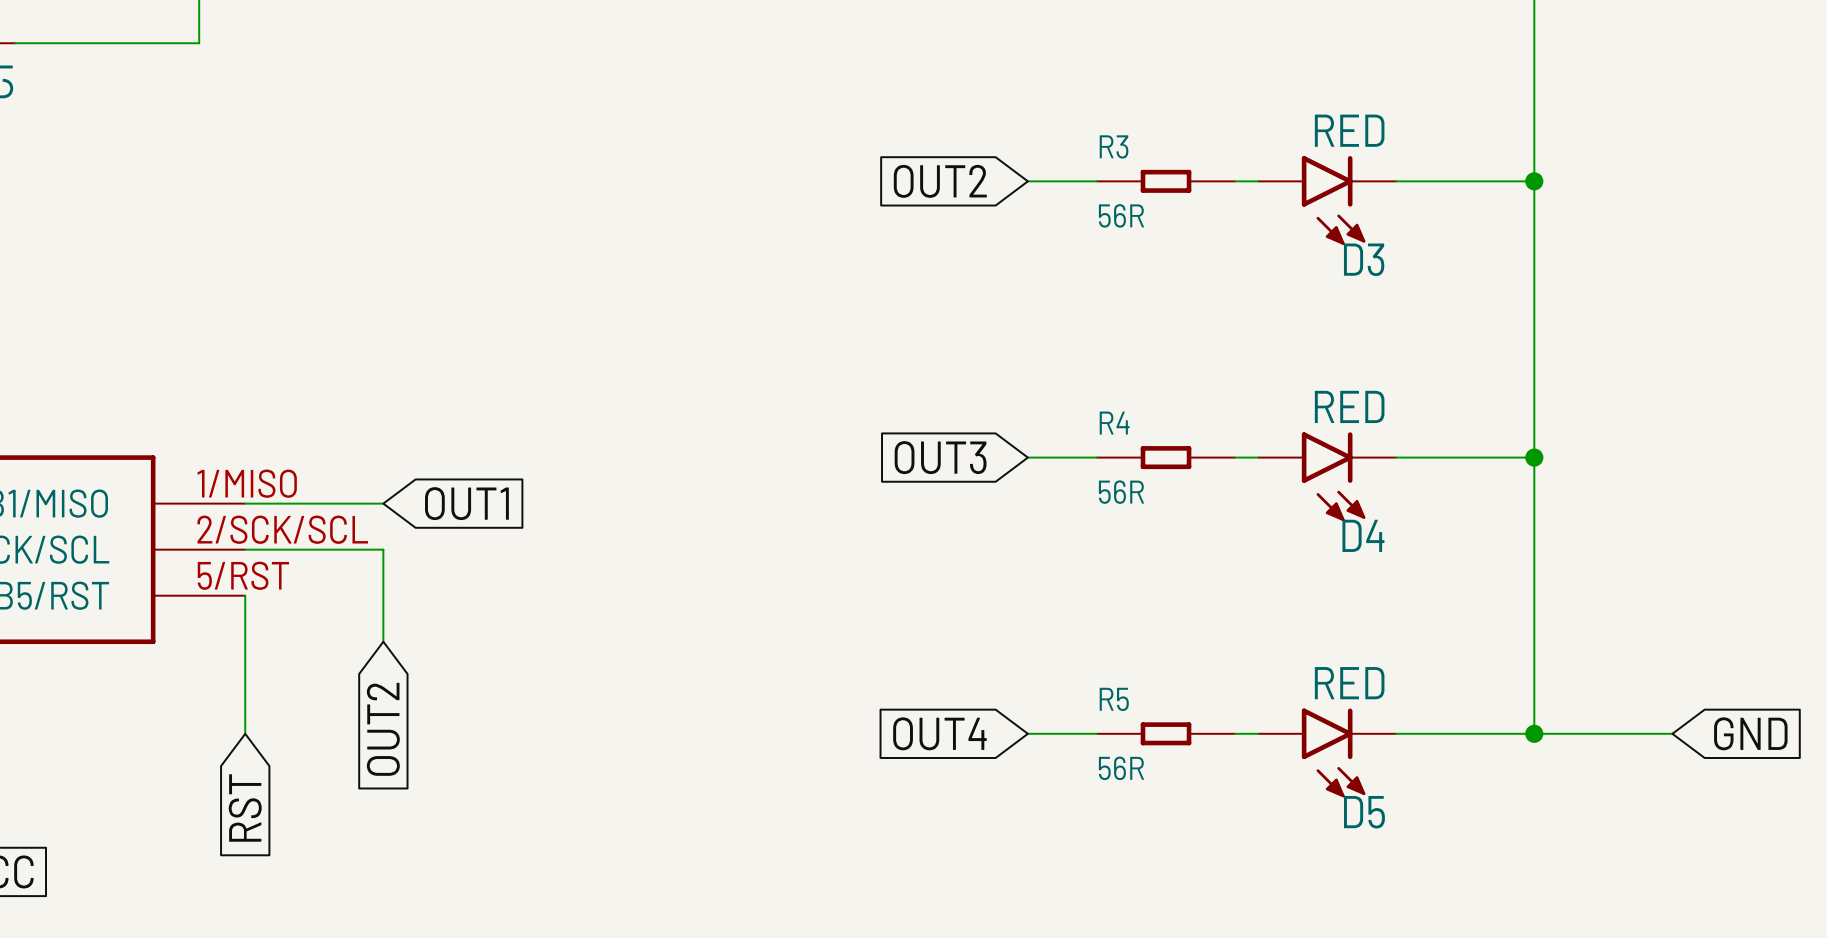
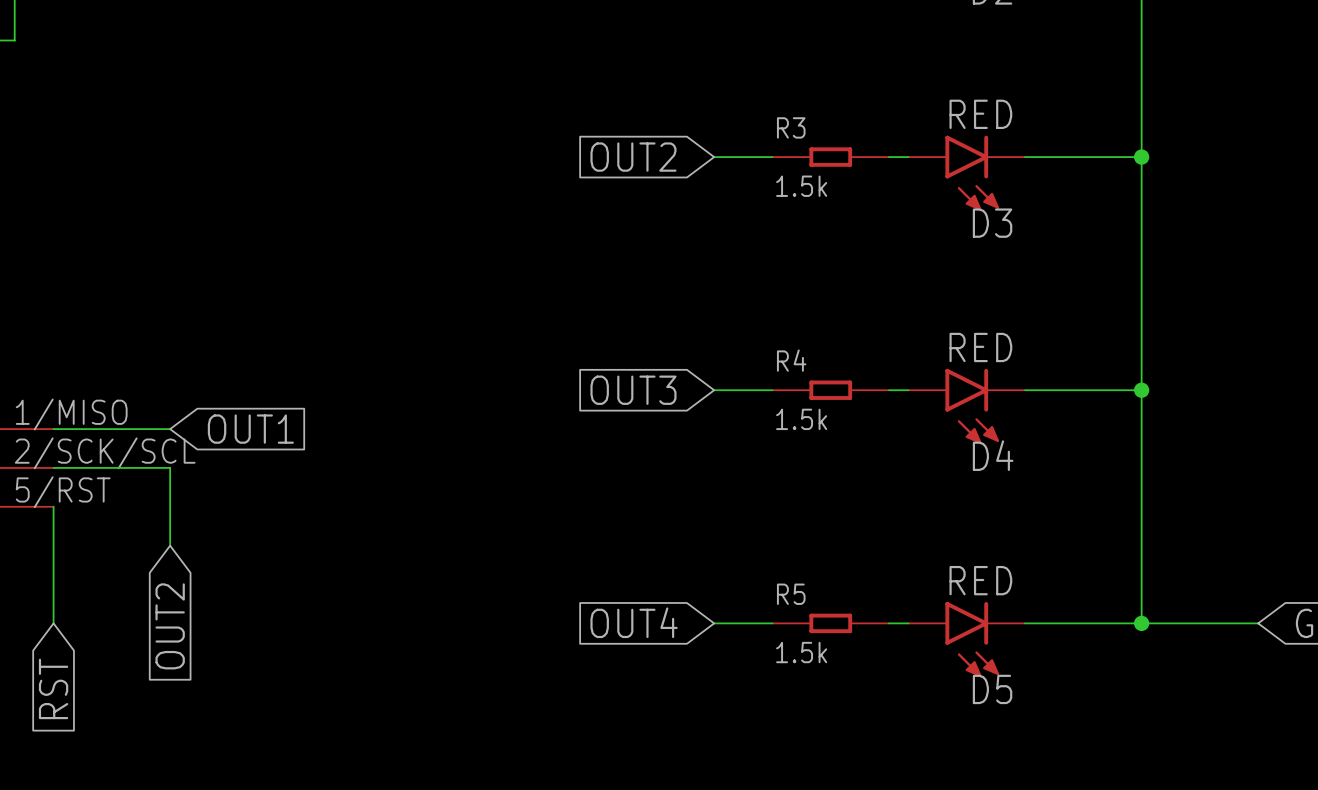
R3 value: 56R (1121, 215) -> 1.5k (801, 186)
R4 value: 56R (1121, 492) -> 1.5k (801, 419)
R5 value: 56R (1121, 768) -> 1.5k (801, 652)

